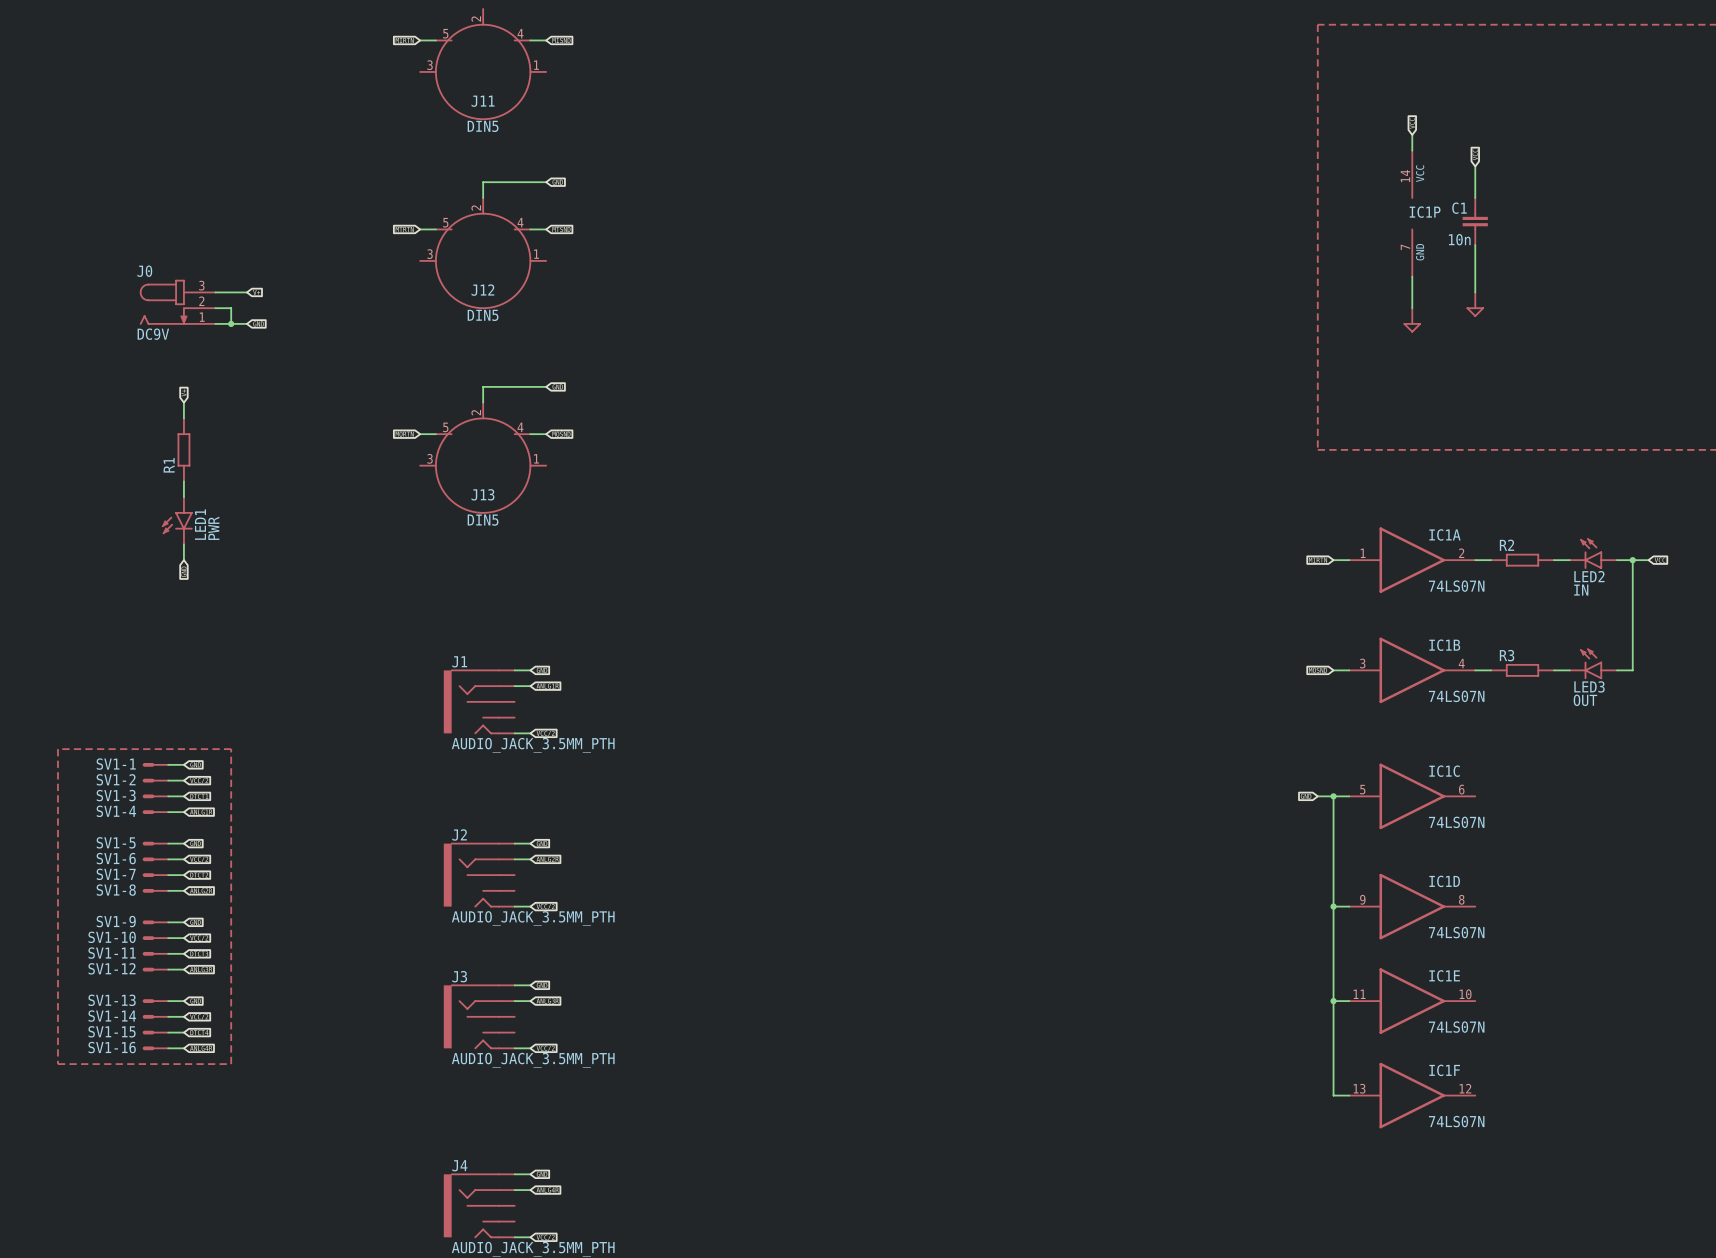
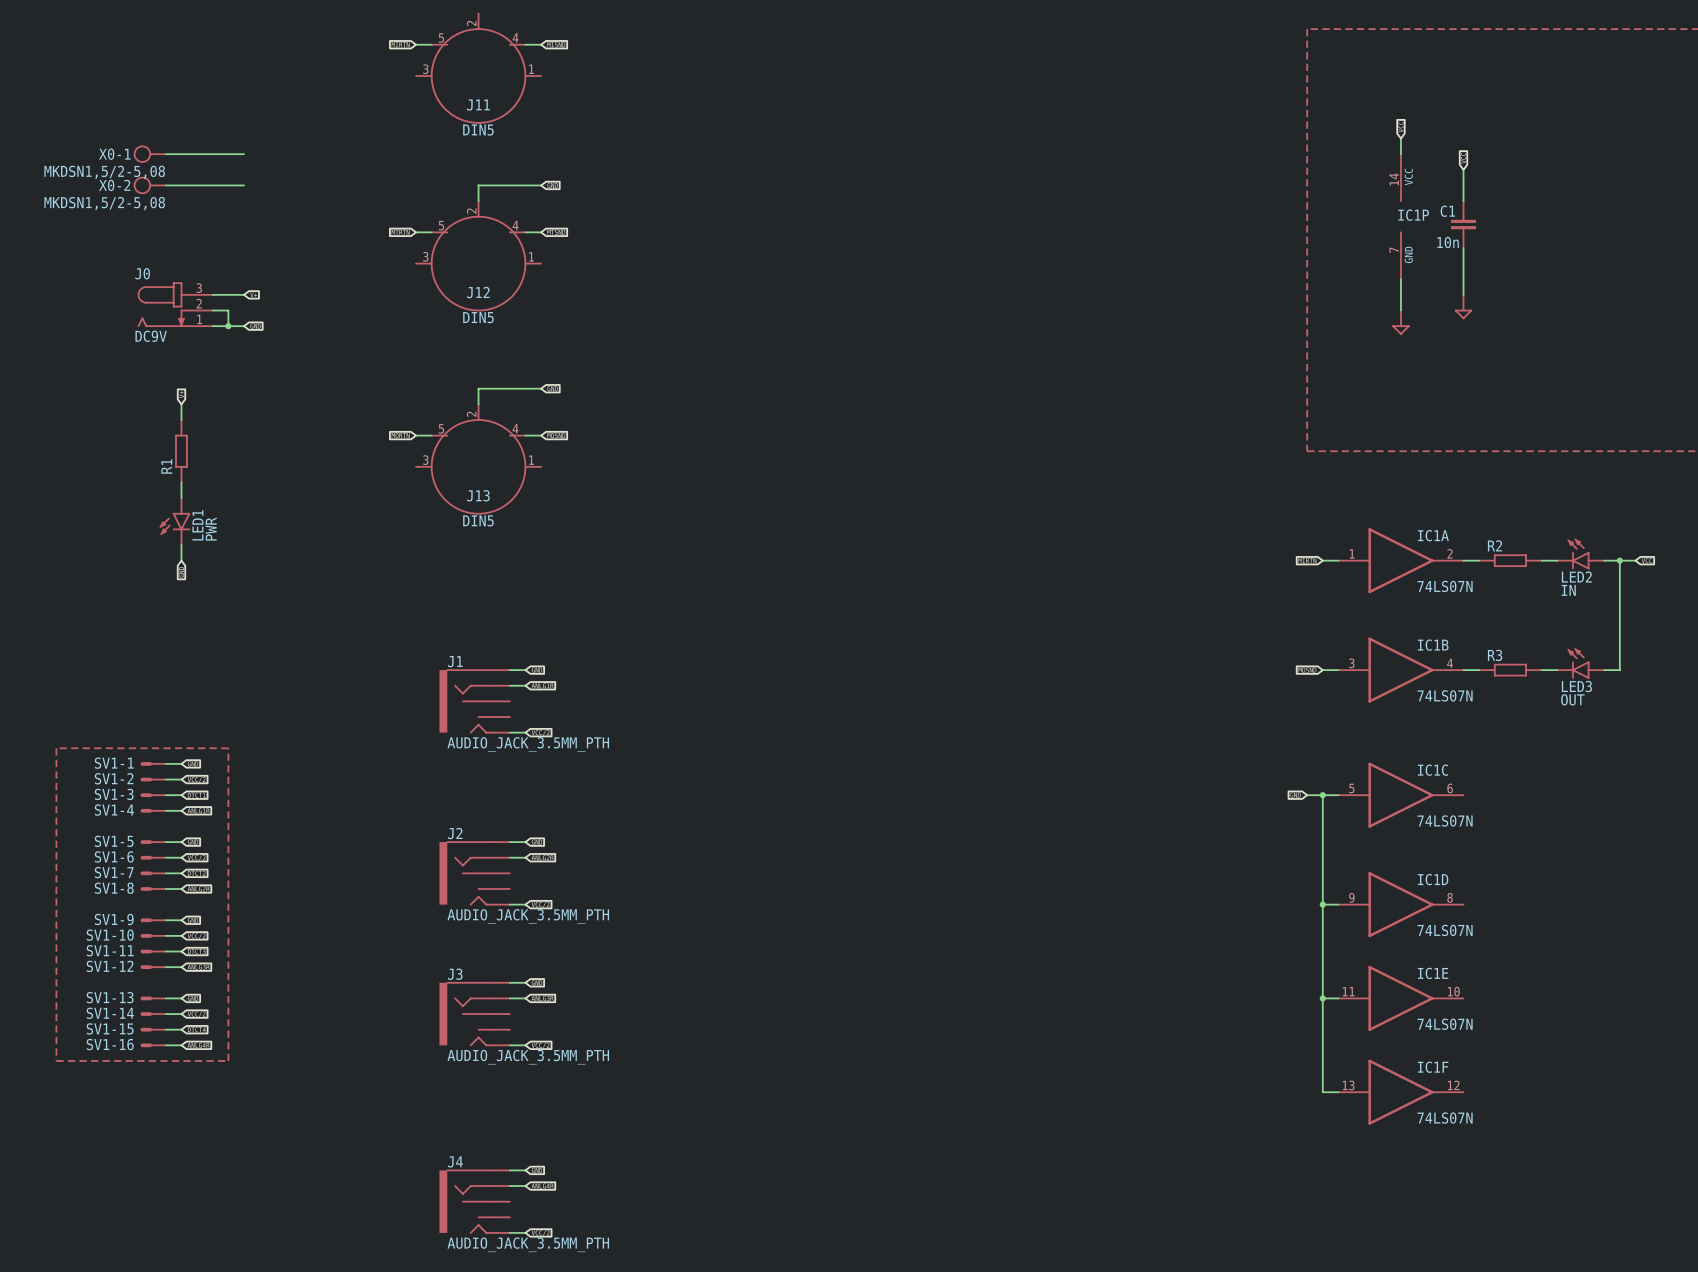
X0-1: none -> MKDSN1,5/2-5,08 (149, 154)
wire: none -> (165, 154) (244, 154)
X0-2: none -> MKDSN1,5/2-5,08 (149, 185)
wire: none -> (165, 185) (244, 185)

